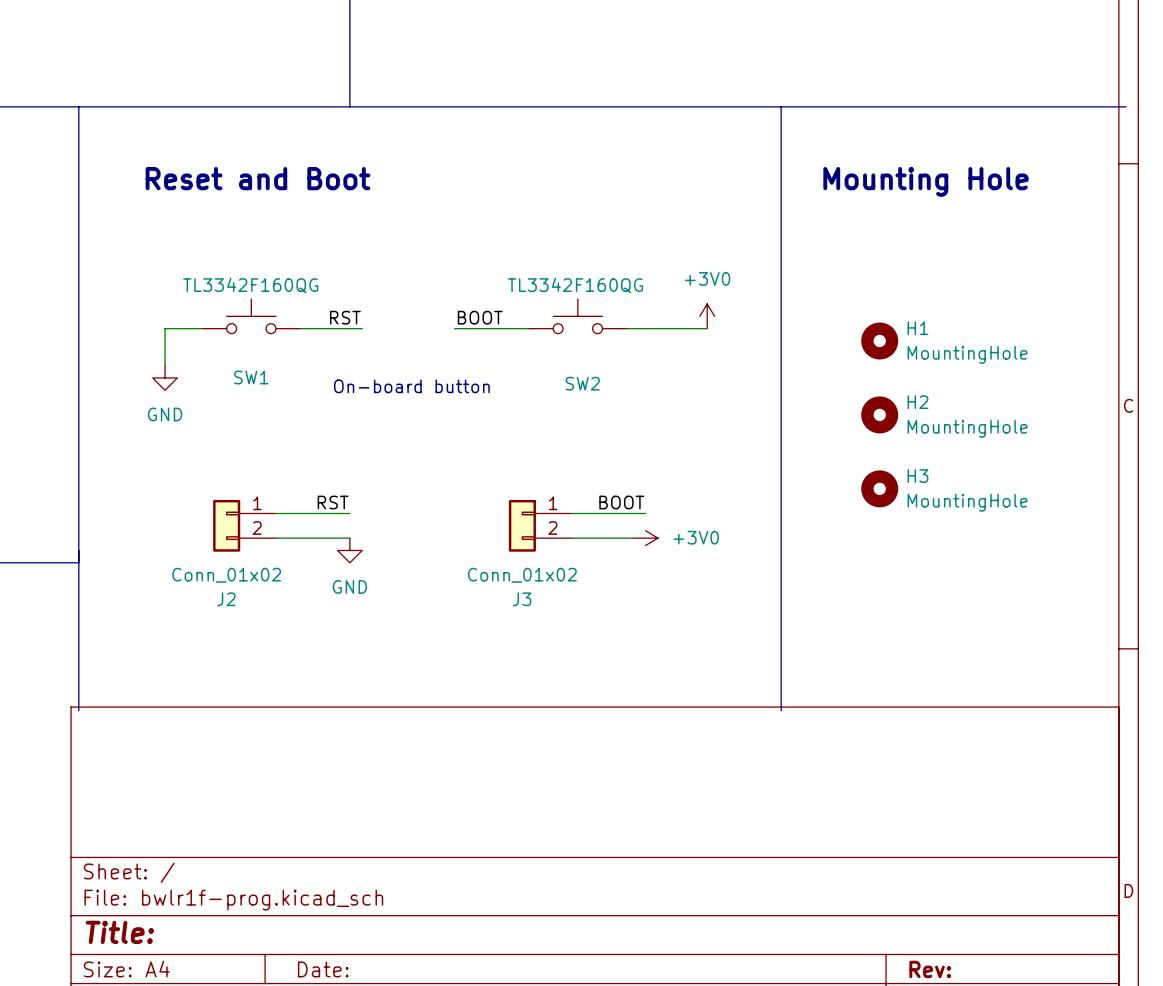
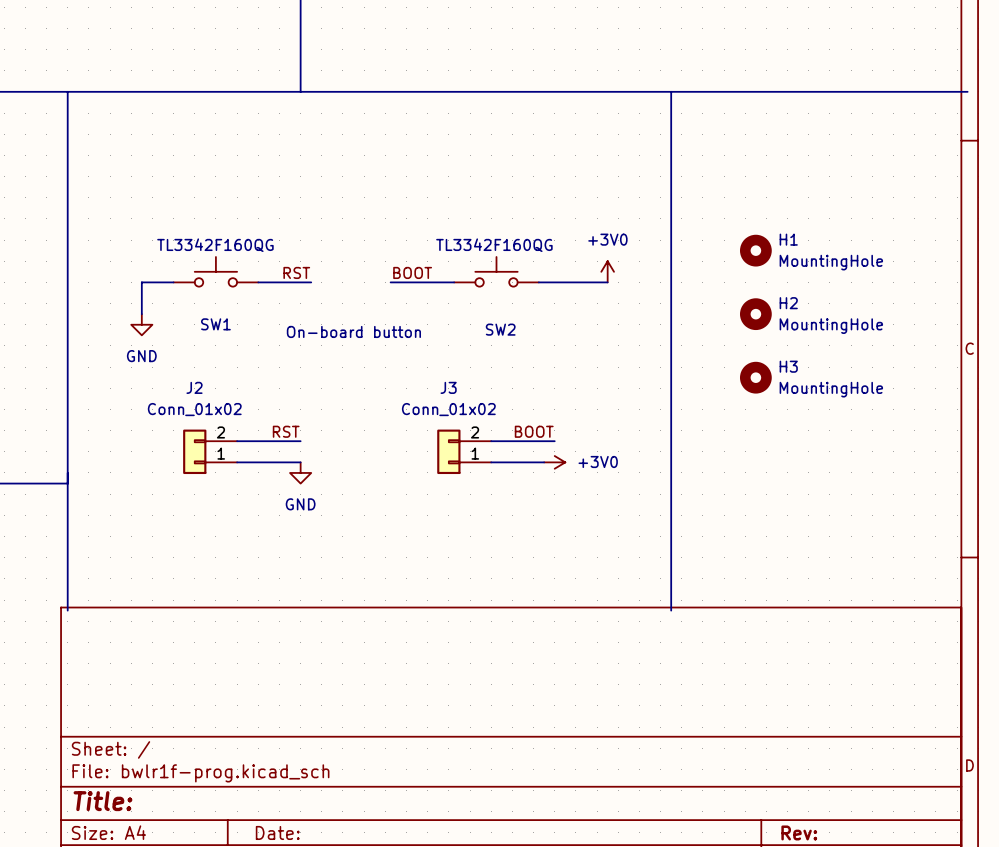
text: Reset and Boot (258, 178) -> none
text: Mounting Hole (926, 181) -> none
H1 position: (879, 340) -> (755, 250)
H2 position: (879, 414) -> (755, 314)
H3 position: (879, 488) -> (755, 377)
J2 flip: as is (226, 525) -> up-down (194, 451)
J3 flip: as is (522, 525) -> up-down (448, 451)

